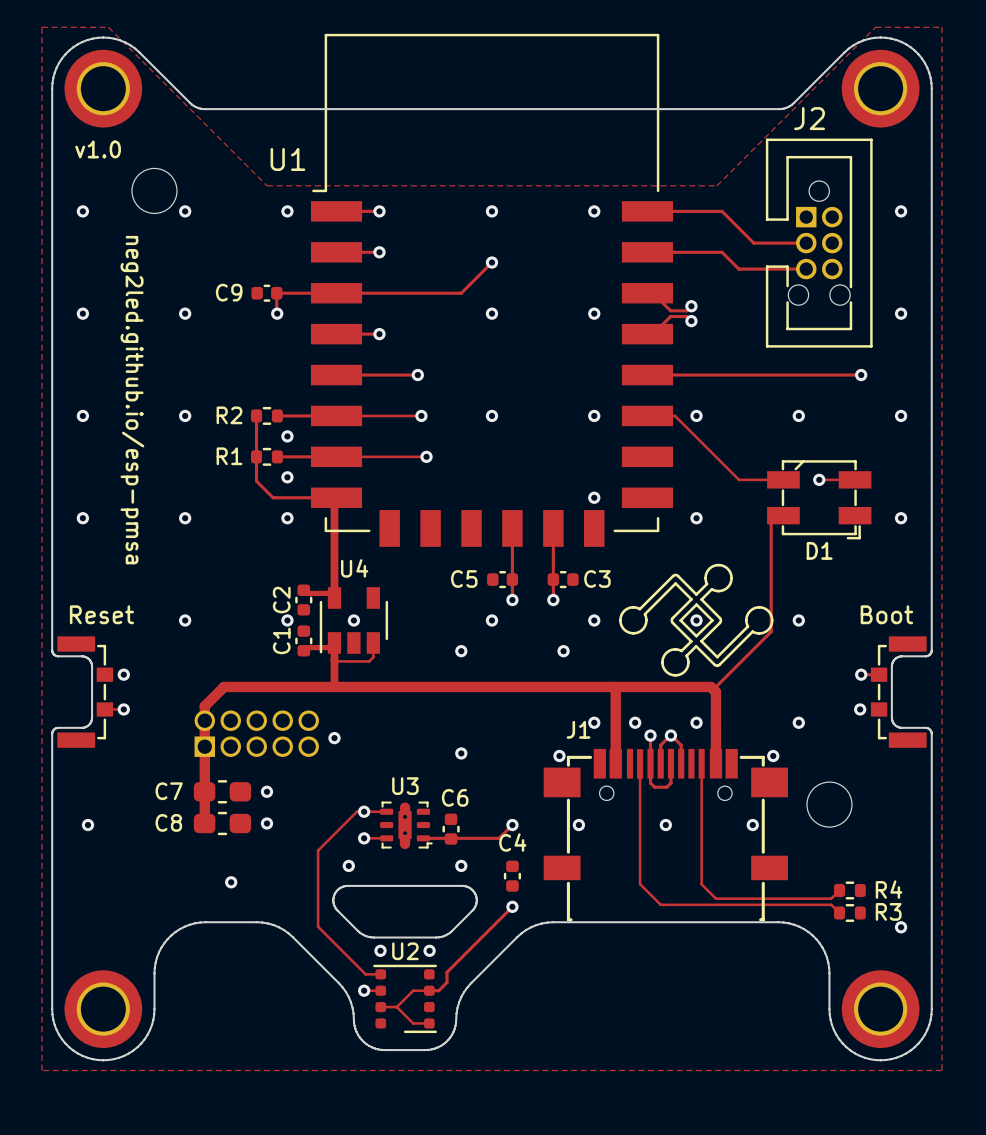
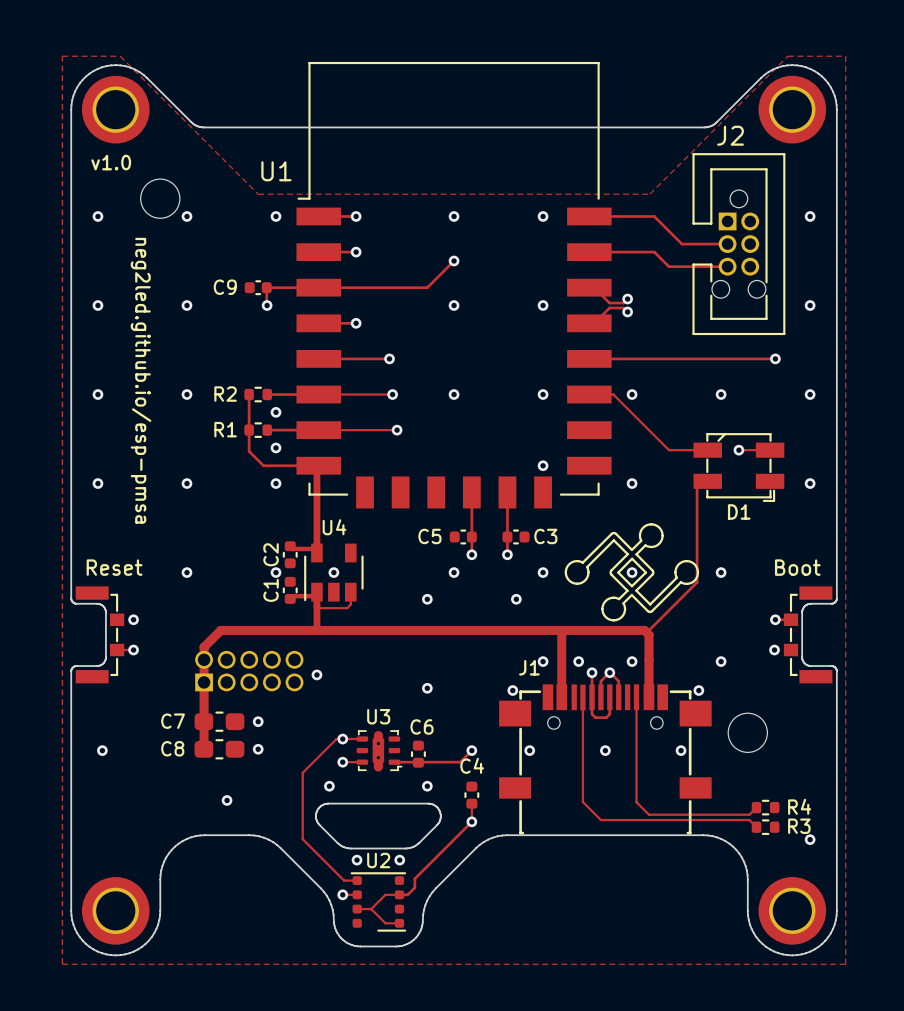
track: none -> (471, 803) (471, 821)

